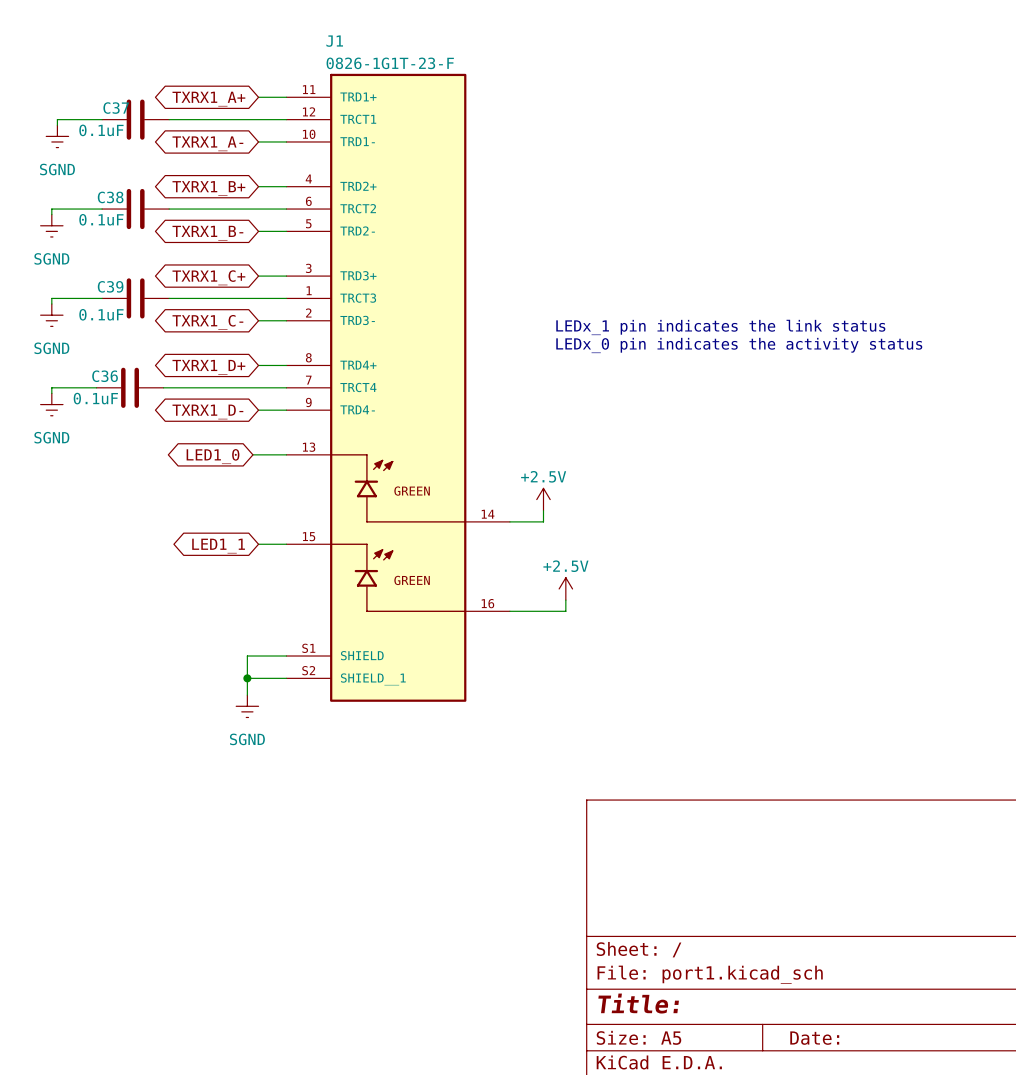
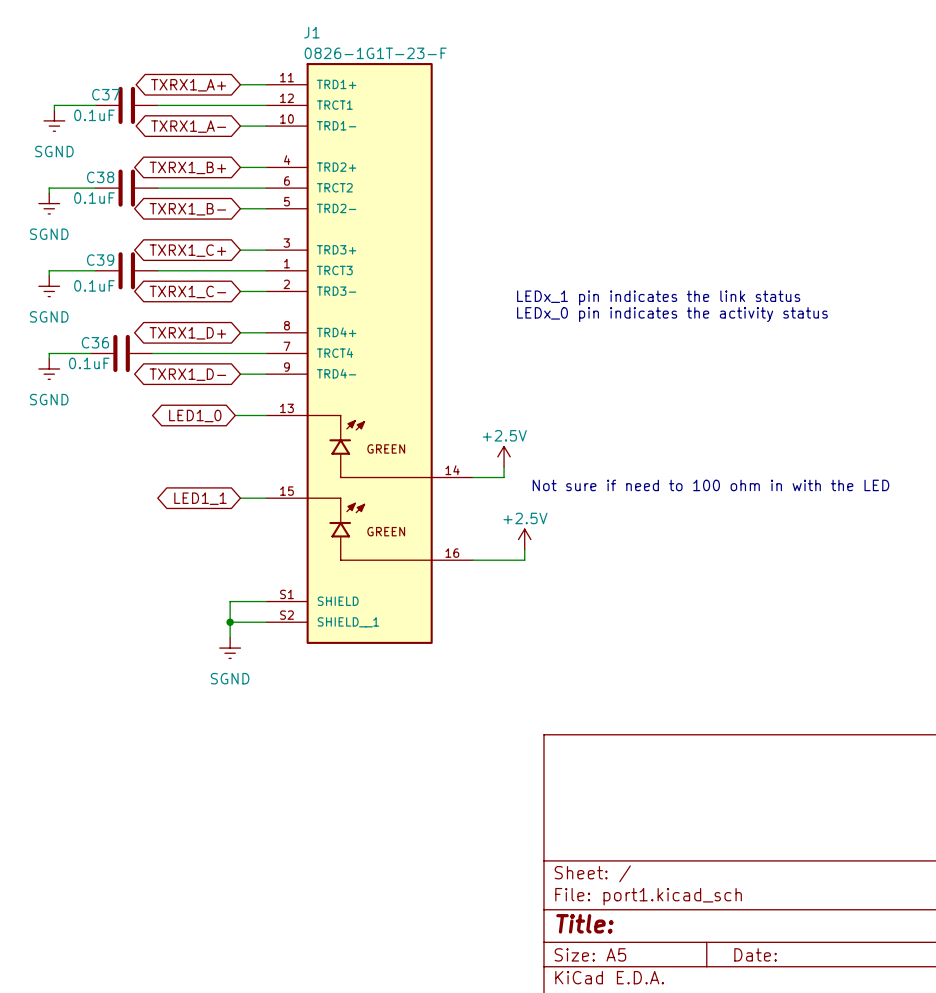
text: none -> Not sure if need to 100 ohm in with the LED (711, 485)

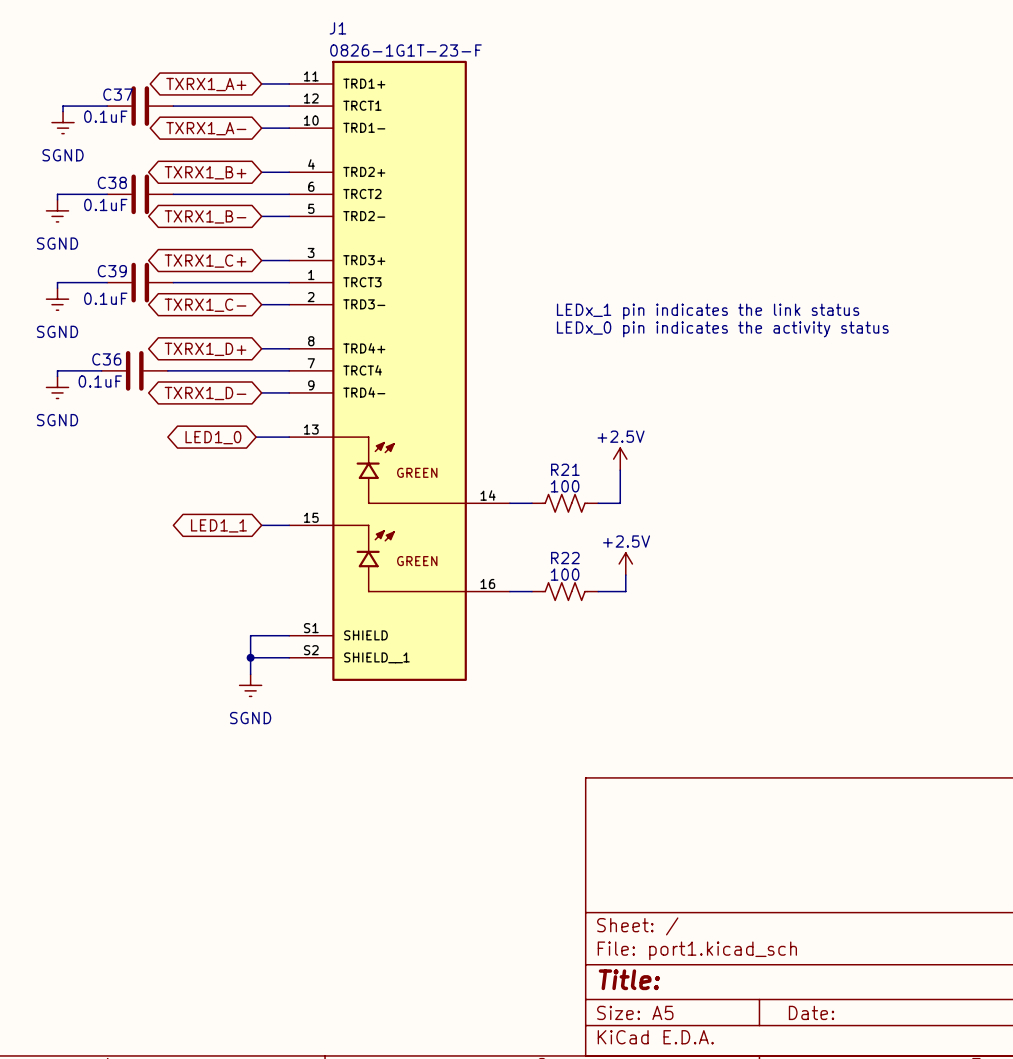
power symbol: none -> +2.5V (620, 459)
wire: none -> (620, 470) (620, 503) (598, 503)
power symbol: +2.5V (504, 456) -> none
R21: none -> 100 (565, 503)
text: Not sure if need to 100 ohm in with the LED (711, 485) -> none
power symbol: none -> +2.5V (625, 563)
power symbol: +2.5V (524, 539) -> none
wire: none -> (625, 575) (625, 591) (598, 591)
wire: (524, 549) (524, 560) (493, 560) -> none
R22: none -> 100 (565, 591)

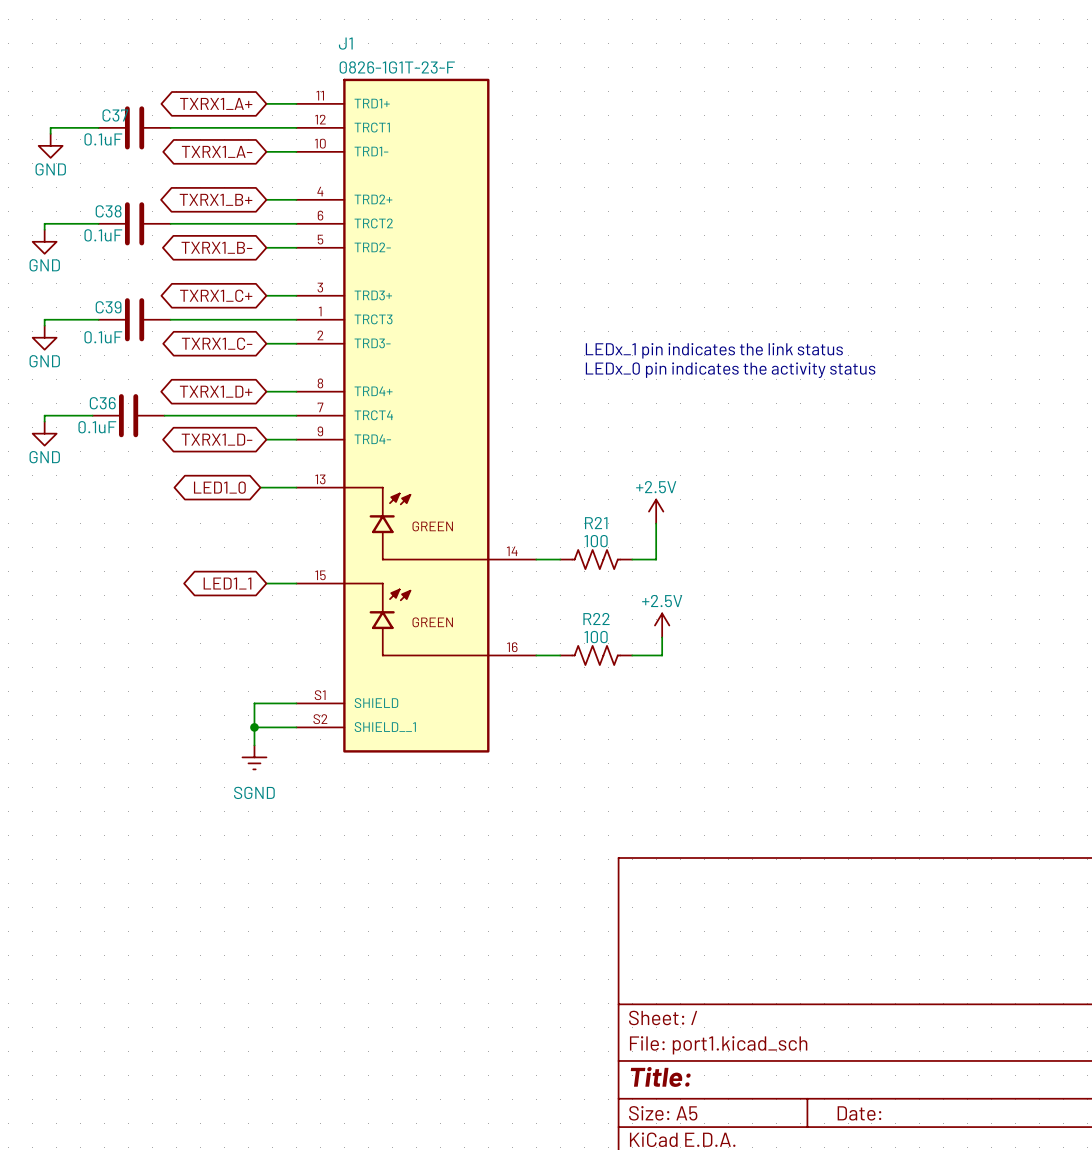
power symbol: SGND (63, 122) -> GND (50, 145)
power symbol: SGND (57, 210) -> GND (44, 241)
power symbol: SGND (57, 299) -> GND (44, 337)
power symbol: SGND (57, 387) -> GND (44, 433)

